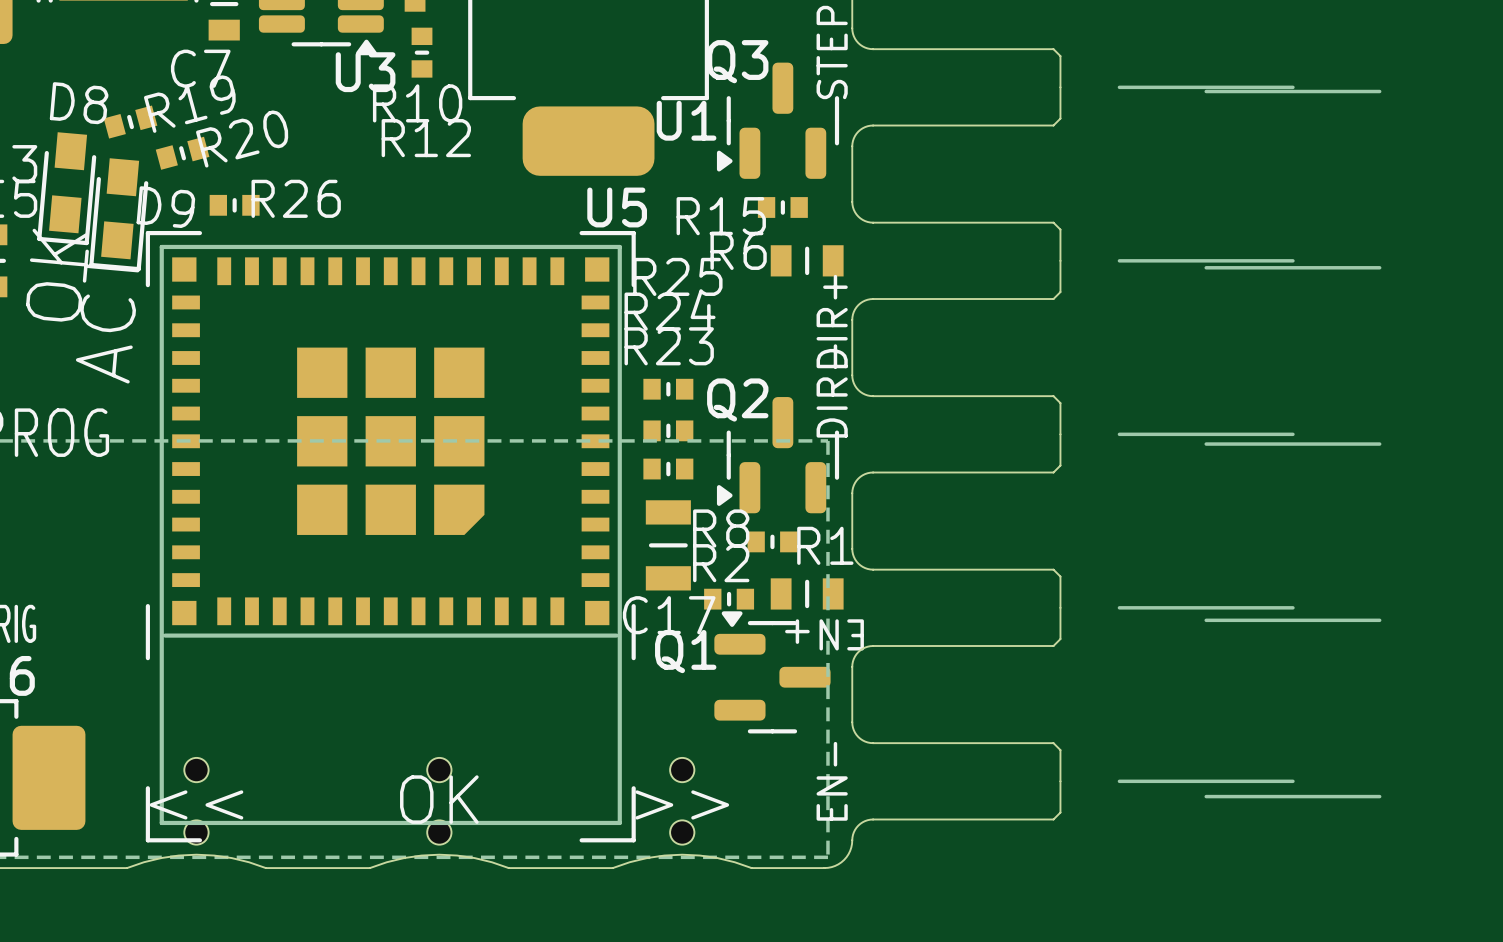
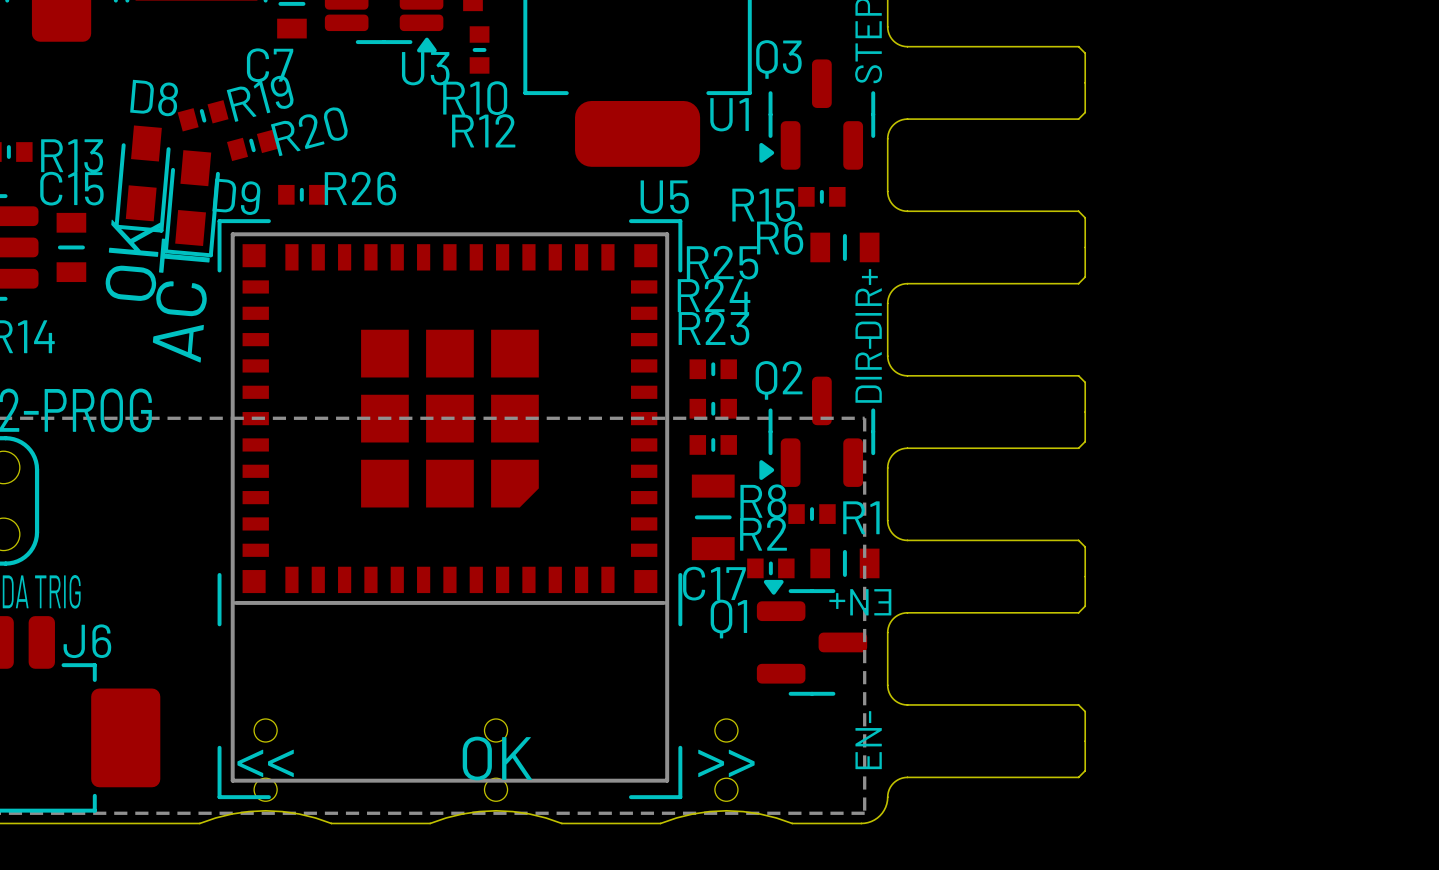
line: (1119, 87) (1292, 87) -> none
line: (1206, 91) (1379, 91) -> none
line: (1119, 260) (1292, 260) -> none
line: (1206, 267) (1379, 267) -> none
line: (1119, 434) (1292, 434) -> none
line: (1206, 444) (1379, 444) -> none
line: (1119, 607) (1292, 607) -> none
line: (1206, 620) (1379, 620) -> none
line: (1119, 781) (1292, 781) -> none
line: (1206, 796) (1379, 796) -> none

